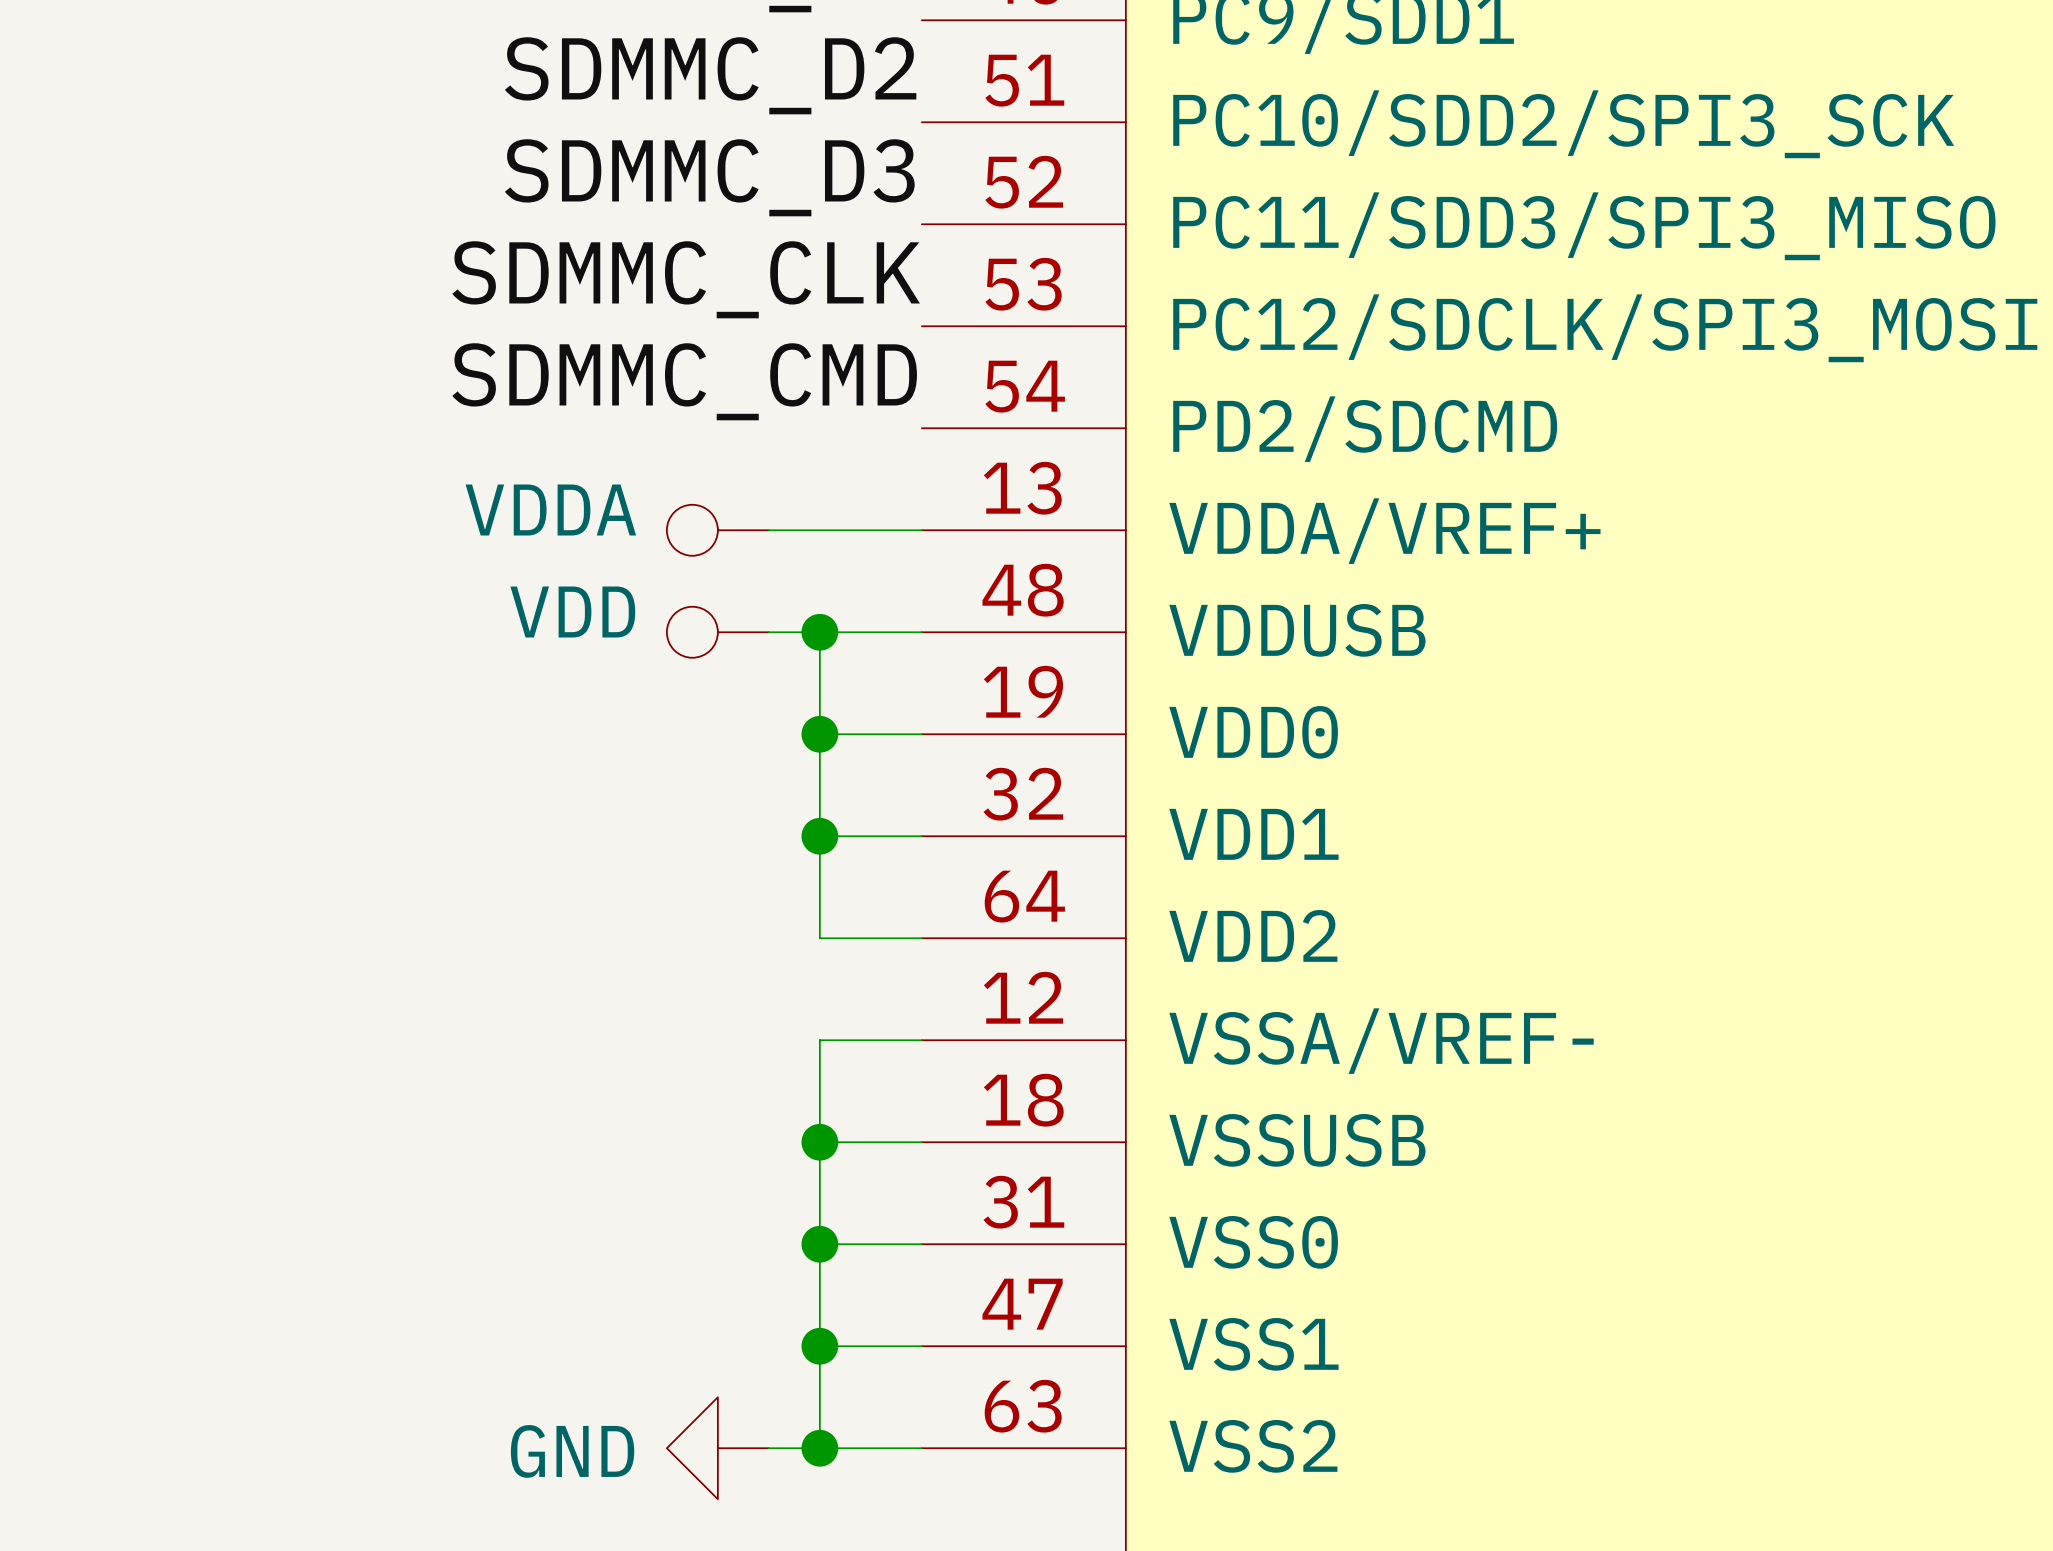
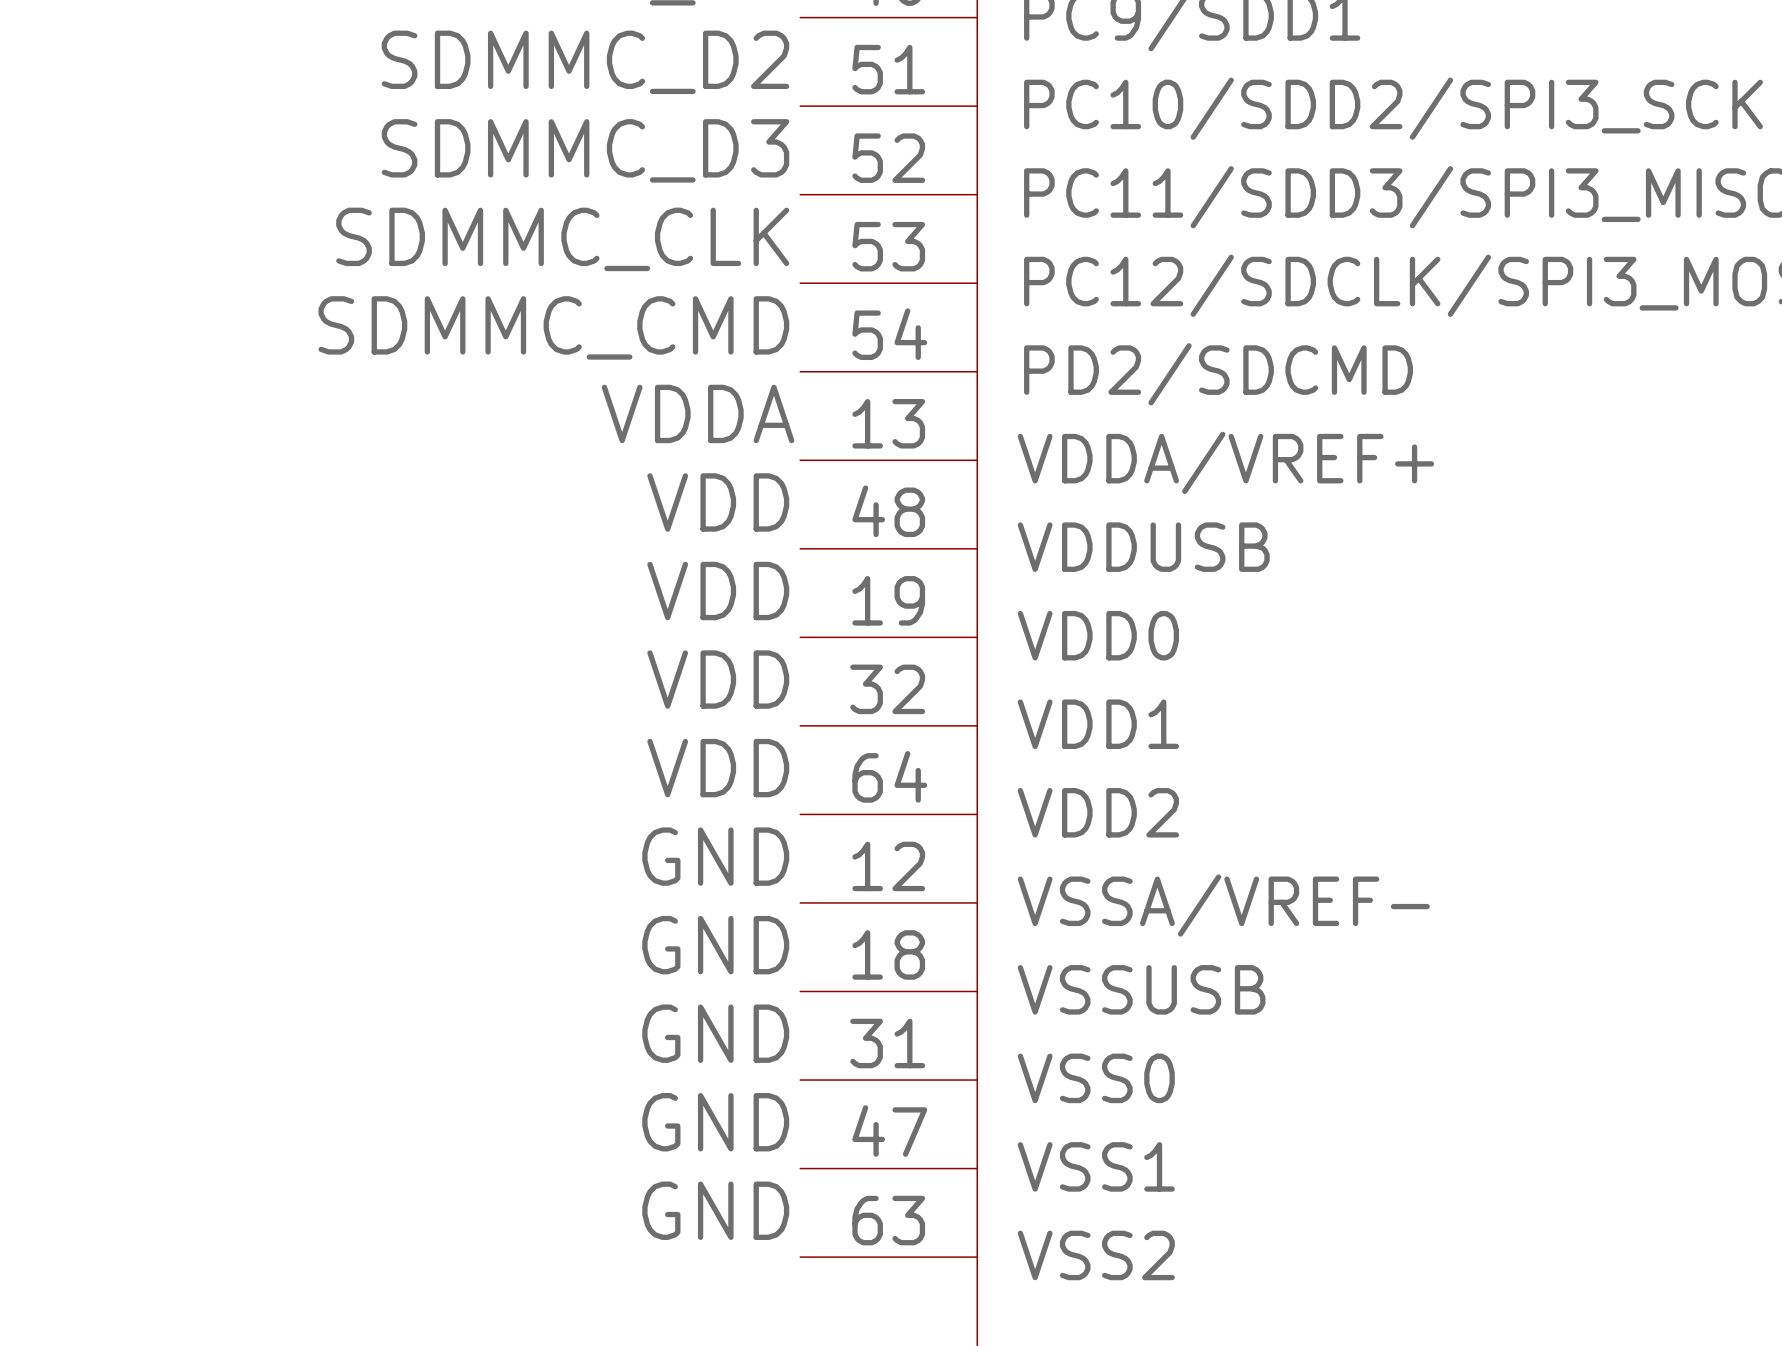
label: none -> VDDA (698, 413)
power symbol: VDDA (717, 530) -> none
wire: (768, 530) (921, 530) -> none
label: none -> VDD (718, 502)
power symbol: VDD (717, 632) -> none
wire: (768, 632) (921, 632) -> none
wire: (819, 632) (819, 938) (921, 938) -> none
junction: (819, 632) -> none
label: none -> VDD (718, 591)
wire: (819, 734) (921, 734) -> none
junction: (819, 734) -> none
label: none -> VDD (718, 679)
wire: (819, 836) (921, 836) -> none
junction: (819, 836) -> none
label: none -> VDD (718, 768)
label: none -> GND (715, 856)
wire: (921, 1040) (819, 1040) (819, 1448) -> none
label: none -> GND (715, 945)
wire: (819, 1142) (921, 1142) -> none
junction: (819, 1142) -> none
label: none -> GND (715, 1033)
wire: (819, 1244) (921, 1244) -> none
junction: (819, 1244) -> none
label: none -> GND (715, 1122)
wire: (819, 1346) (921, 1346) -> none
junction: (819, 1346) -> none
label: none -> GND (715, 1210)
power symbol: GND (717, 1448) -> none
wire: (768, 1448) (921, 1448) -> none
junction: (819, 1448) -> none

